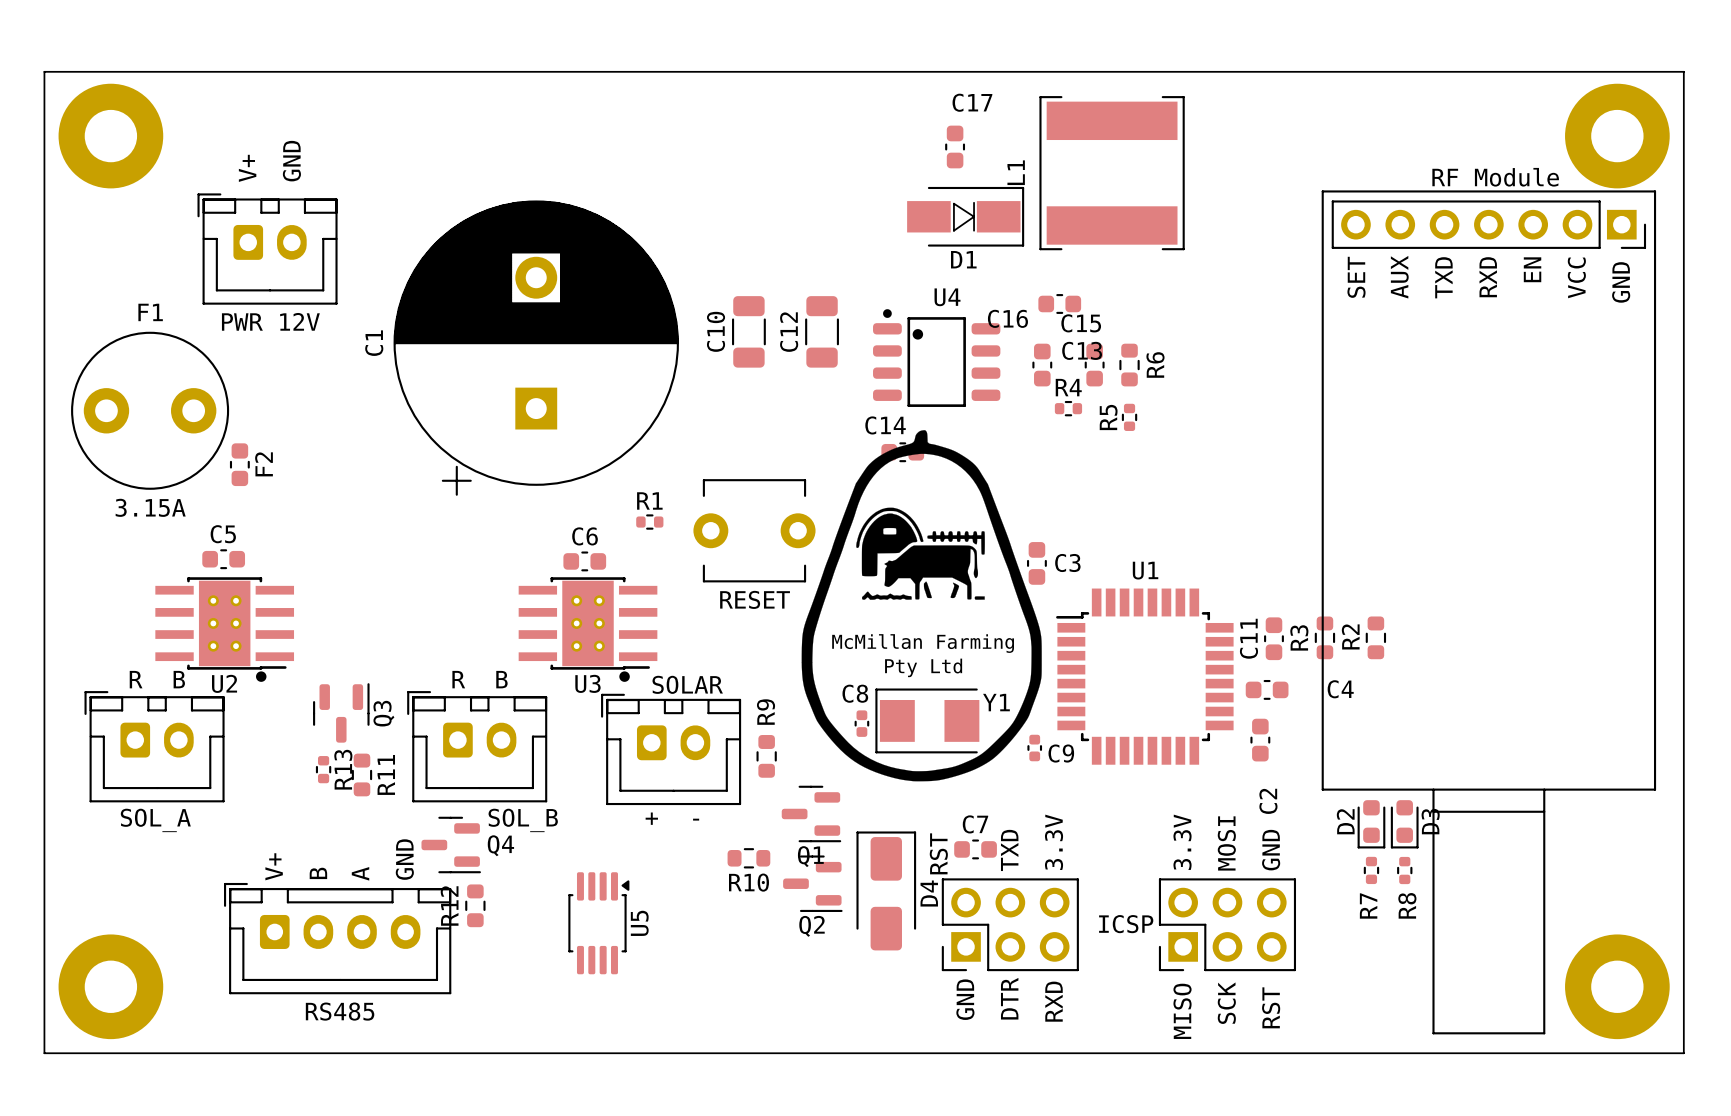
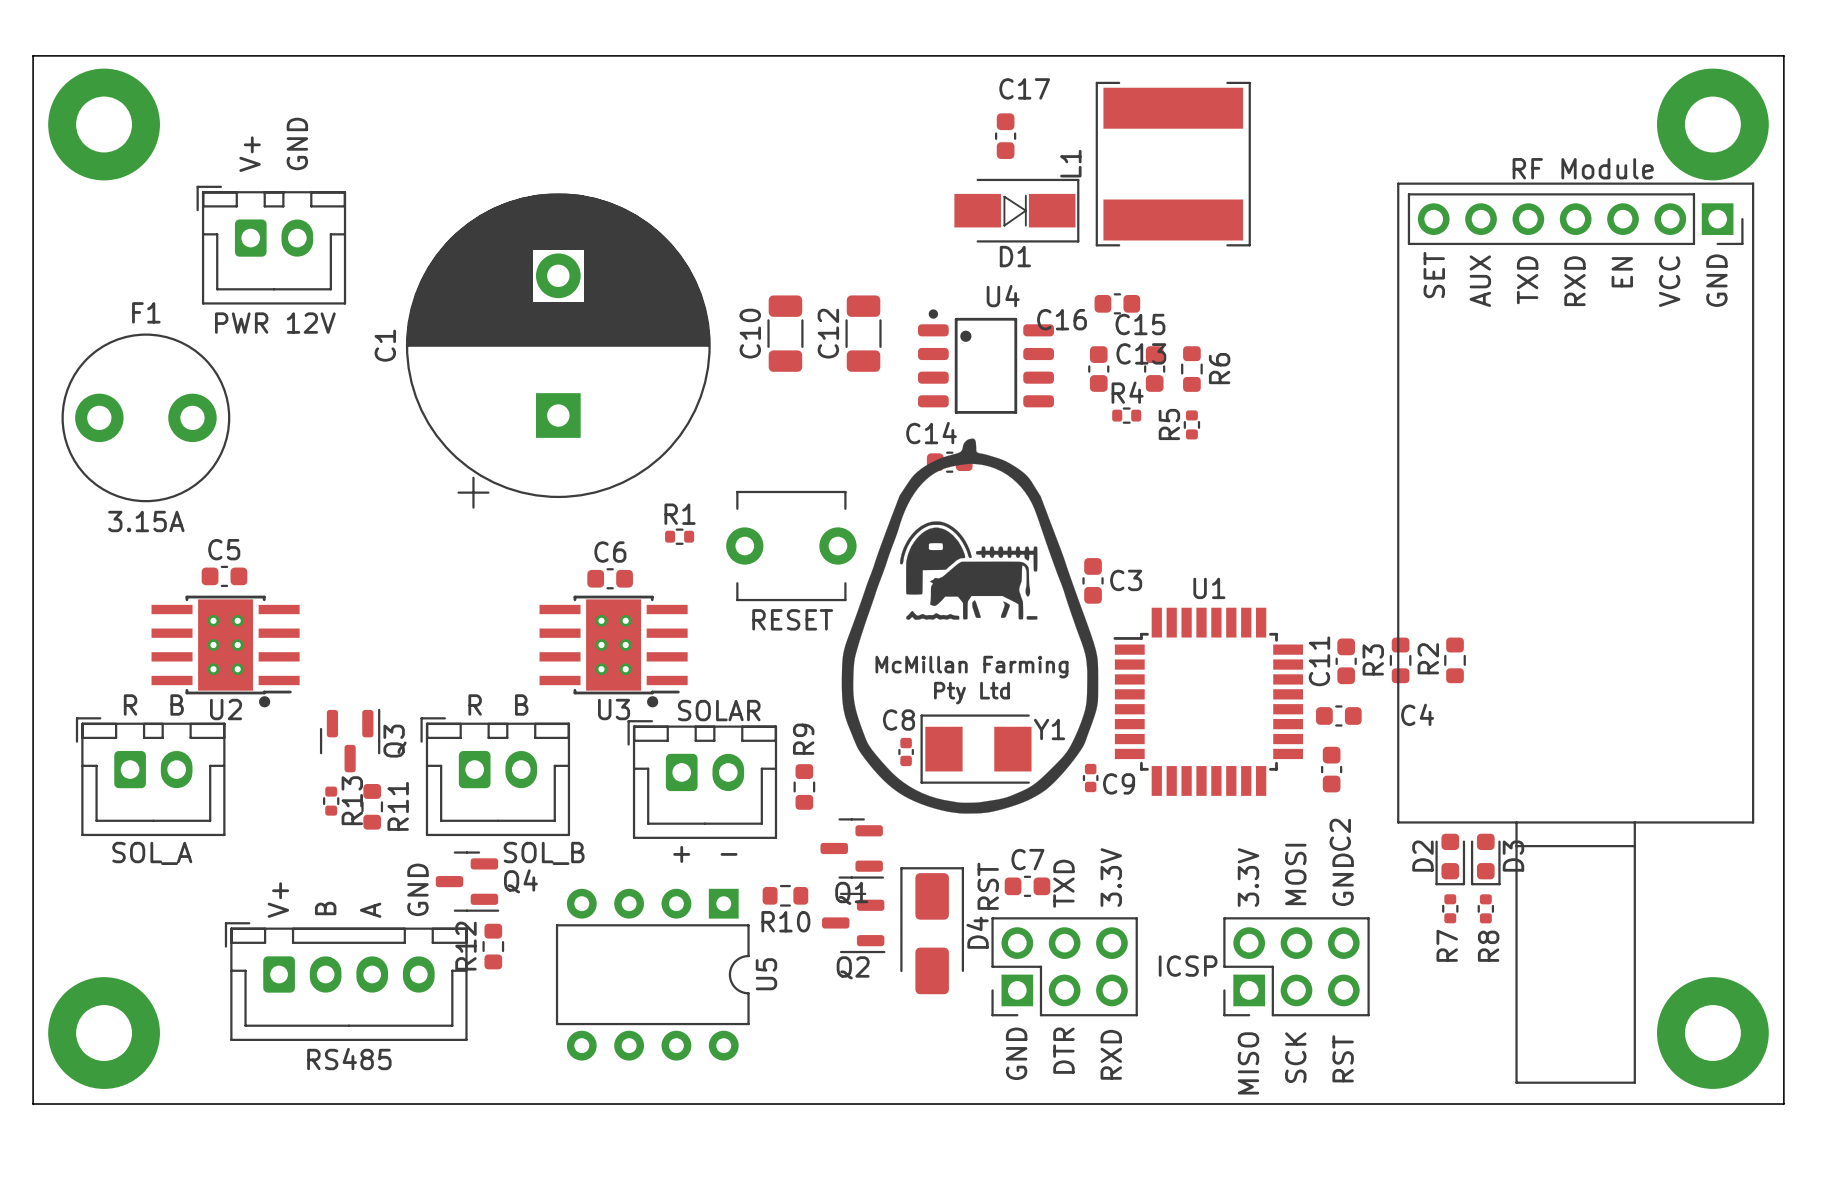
F2: (239, 464) -> none
U5 footprint: [568, 872, 630, 975] -> [555, 888, 750, 1061]
U5 name position: U5 (639, 923) -> U5 (766, 974)

